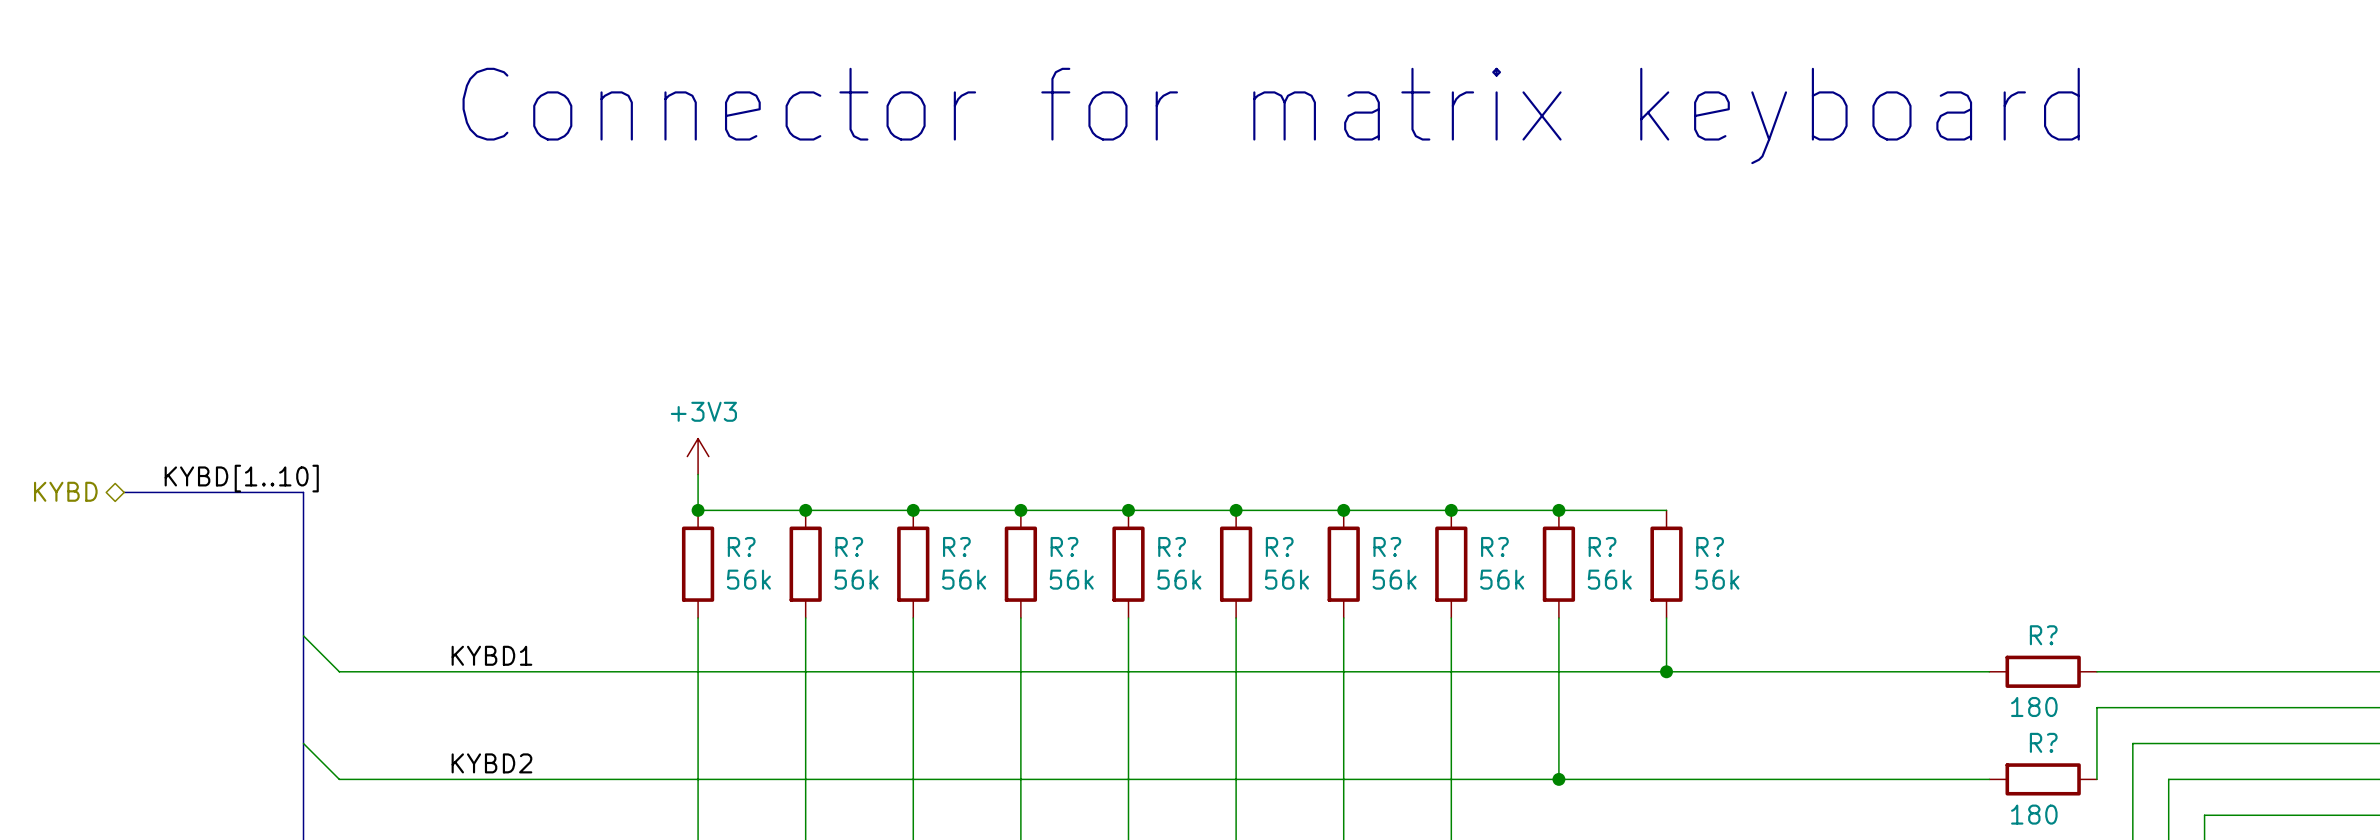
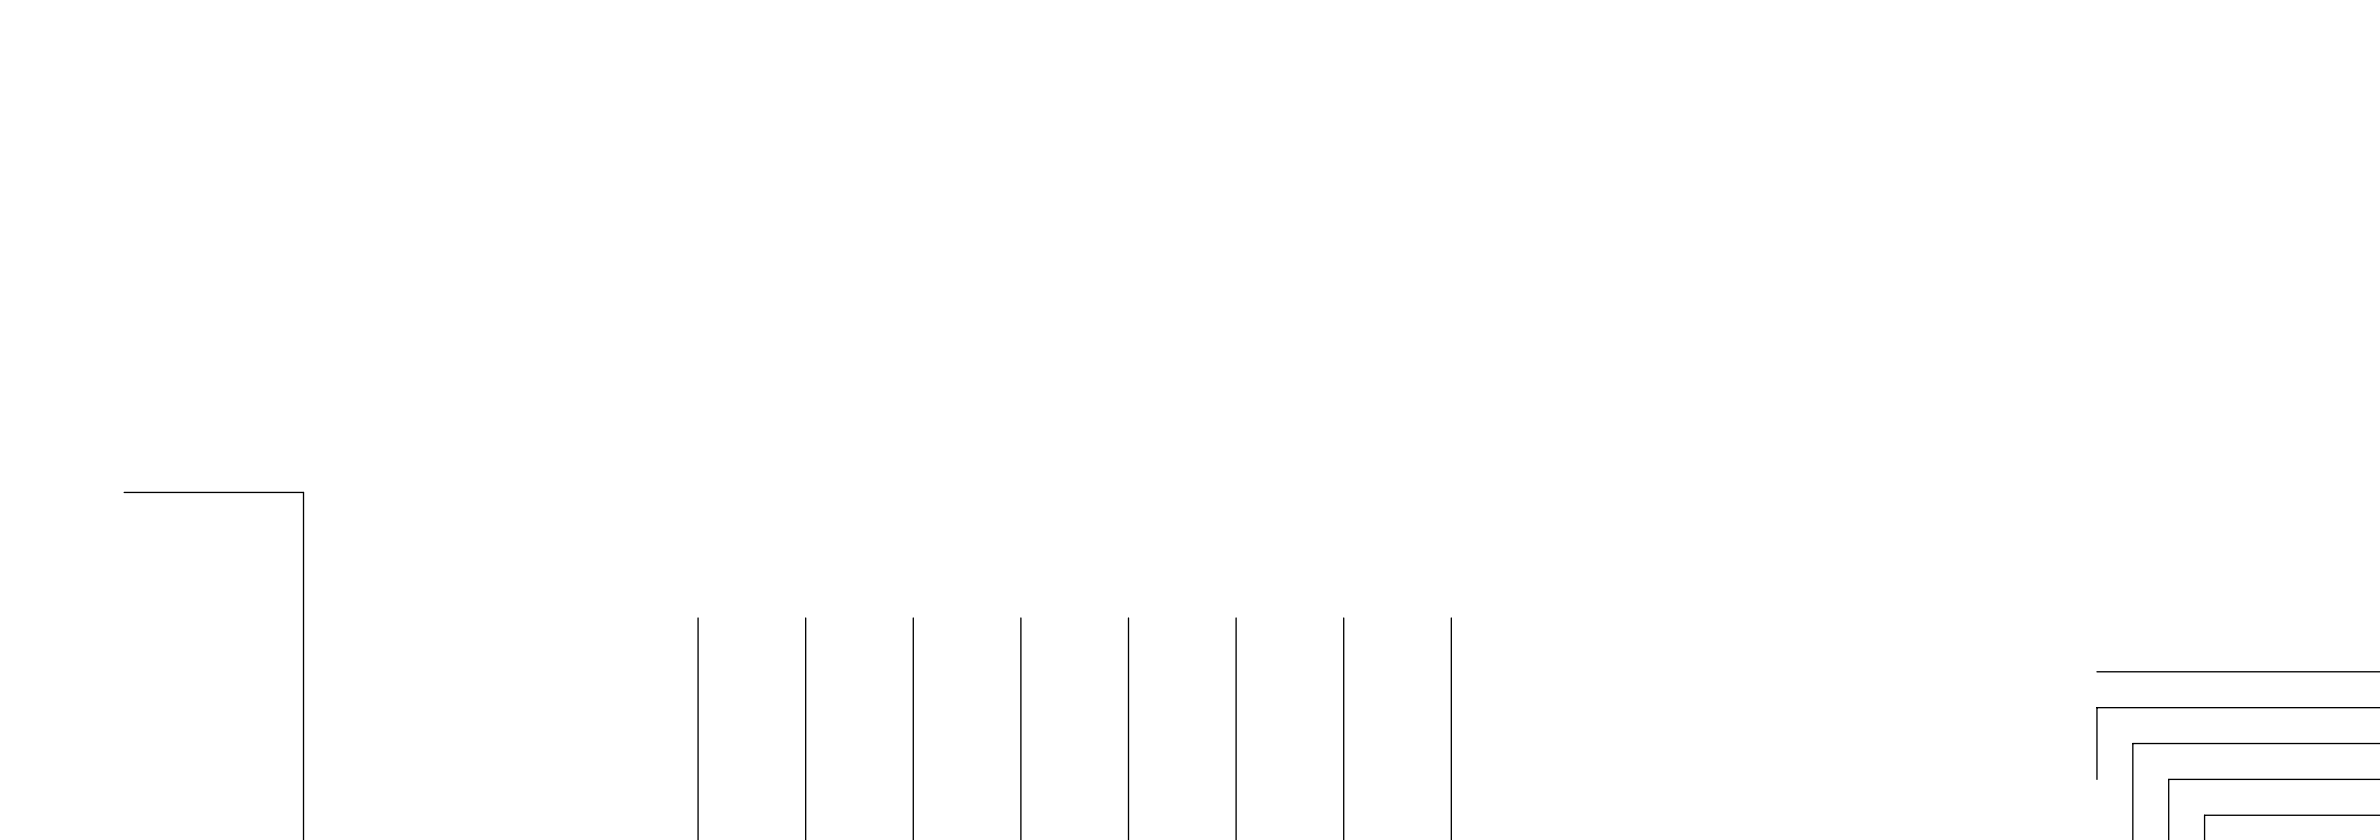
text: Connector for matrix keyboard (1271, 115) -> none
power symbol: +3V3 (698, 456) -> none
wire: (698, 474) (698, 510) (1666, 510) -> none
label: KYBD[1..10] (241, 478) -> none
hierarchical label: KYBD (65, 491) -> none
junction: (698, 510) -> none
junction: (805, 510) -> none
junction: (913, 510) -> none
junction: (1020, 510) -> none
junction: (1128, 510) -> none
junction: (1236, 510) -> none
junction: (1343, 510) -> none
junction: (1451, 510) -> none
junction: (1558, 510) -> none
R?: 56k (698, 564) -> none
R?: 56k (805, 564) -> none
R?: 56k (913, 564) -> none
R?: 56k (1020, 564) -> none
R?: 56k (1128, 564) -> none
R?: 56k (1236, 564) -> none
R?: 56k (1343, 564) -> none
R?: 56k (1451, 564) -> none
R?: 56k (1558, 564) -> none
R?: 56k (1666, 564) -> none
wire: (1558, 617) (1558, 779) -> none
wire: (1666, 617) (1666, 671) -> none
wire: (303, 635) (339, 671) (1989, 671) -> none
label: KYBD1 (491, 655) -> none
junction: (1666, 671) -> none
R?: 180 (2043, 671) -> none
wire: (303, 743) (339, 779) (1989, 779) -> none
label: KYBD2 (491, 763) -> none
junction: (1558, 779) -> none
R?: 180 (2043, 779) -> none

